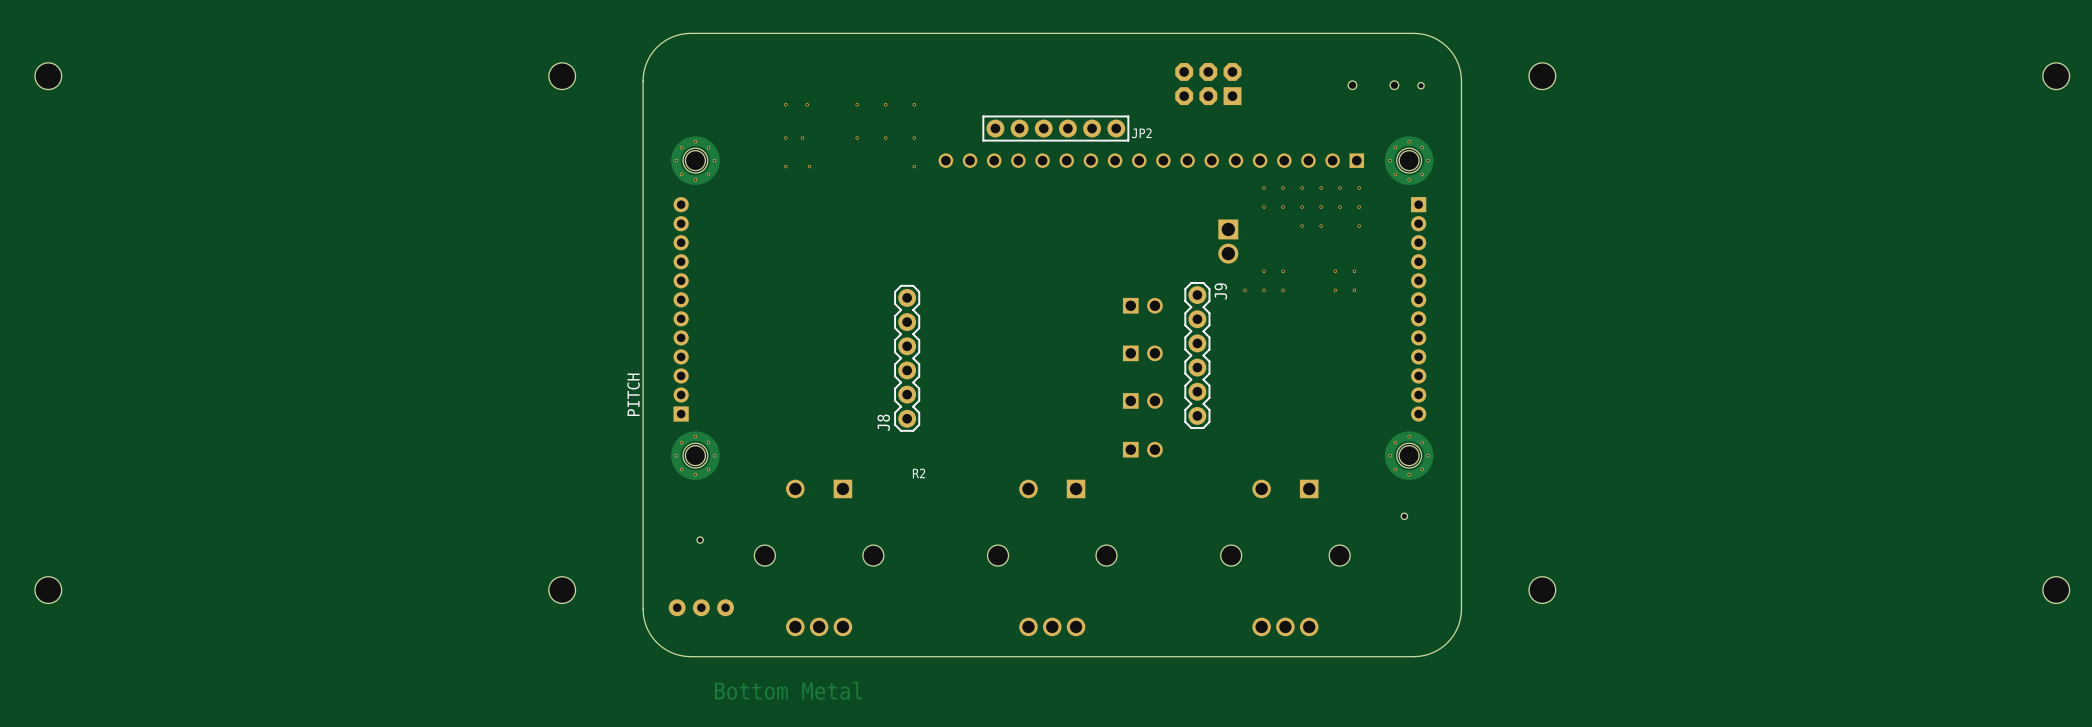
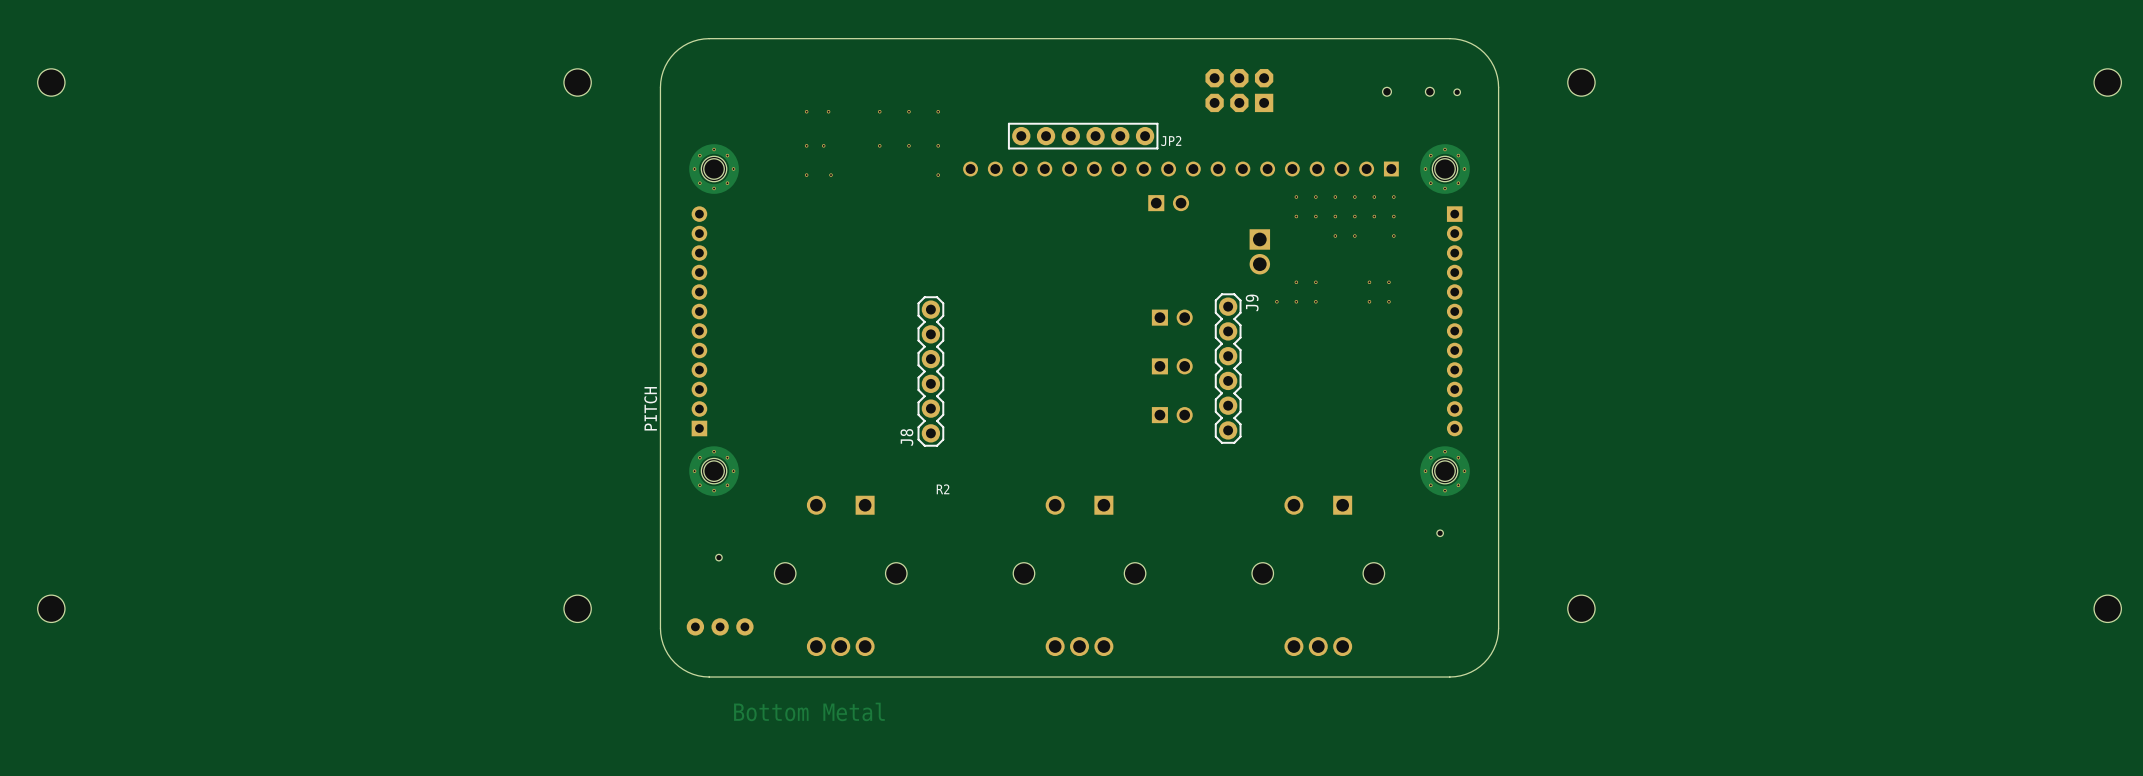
part: none -> (1168, 203)
part: (1142, 449) -> none

